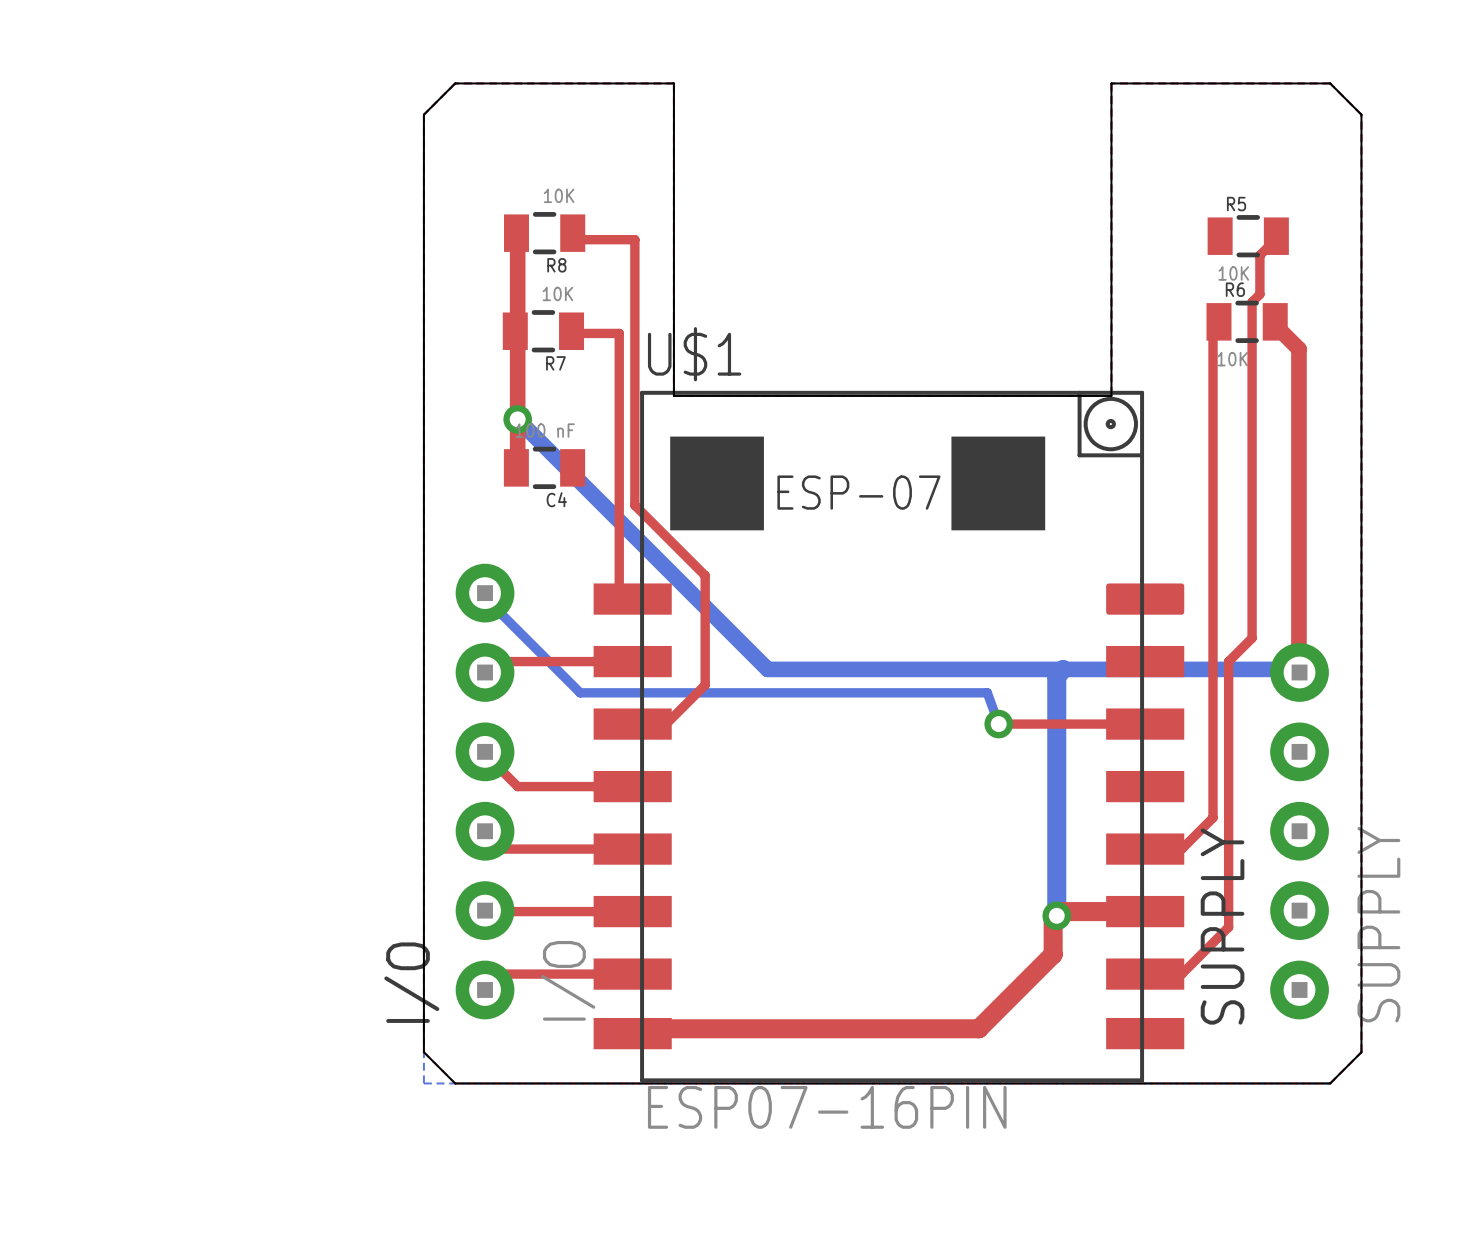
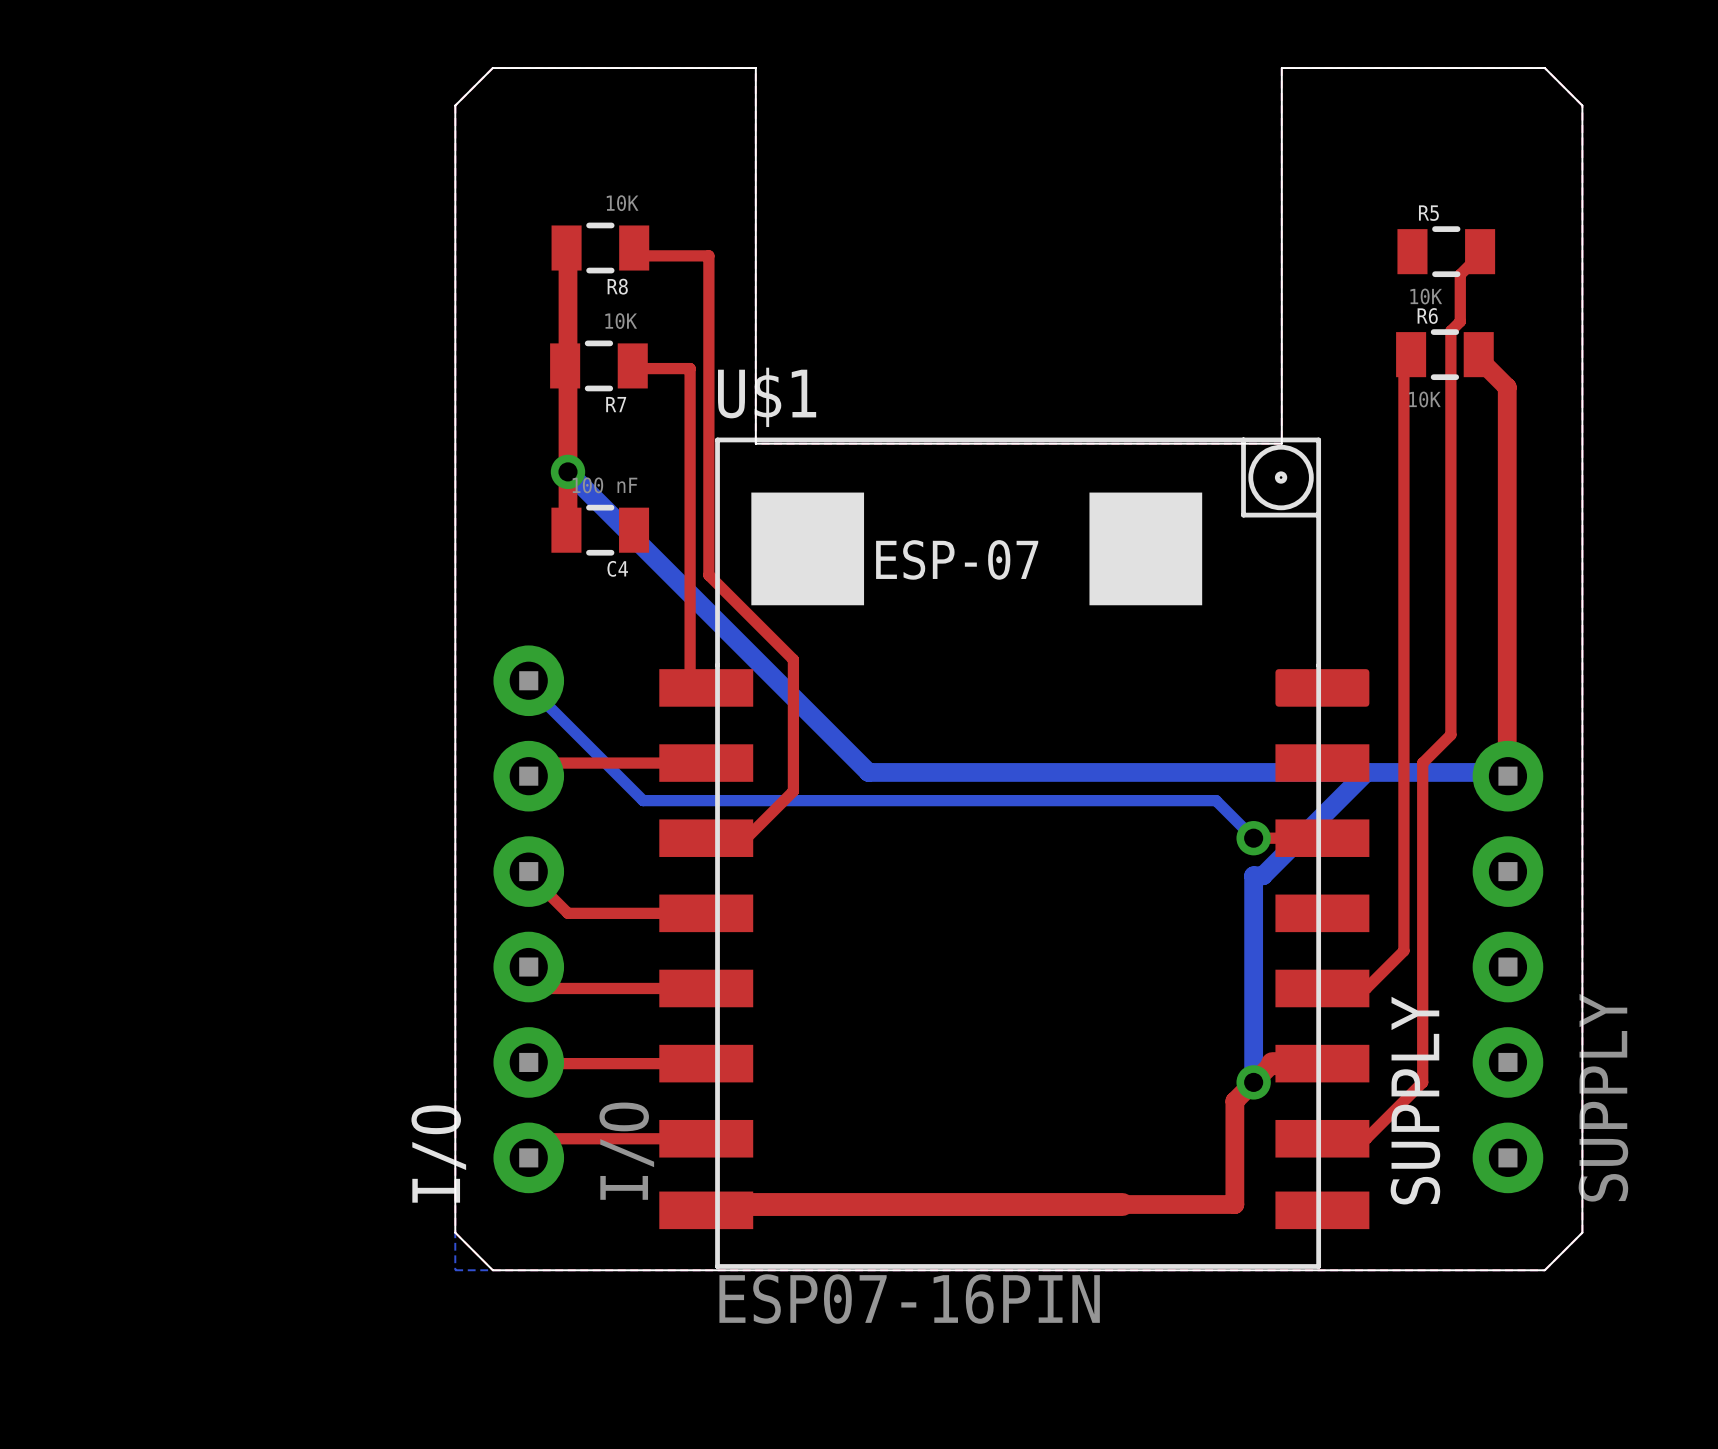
bottom track: (1063, 669) (1056, 675) (1056, 915) -> none
bottom track: none -> (1366, 772) (1263, 875) (1253, 875) (1253, 1082)
bottom track: (987, 692) (998, 724) -> (1132, 800) (1216, 800) (1253, 838)
top track: (998, 724) (1088, 724) -> none
via position: (998, 724) -> (1253, 838)
top track: (1103, 911) (1060, 911) (1053, 919) (1053, 954) (978, 1028) -> (1272, 1063) (1234, 1101) (1234, 1204) (1122, 1204)
via position: (1056, 915) -> (1253, 1082)

